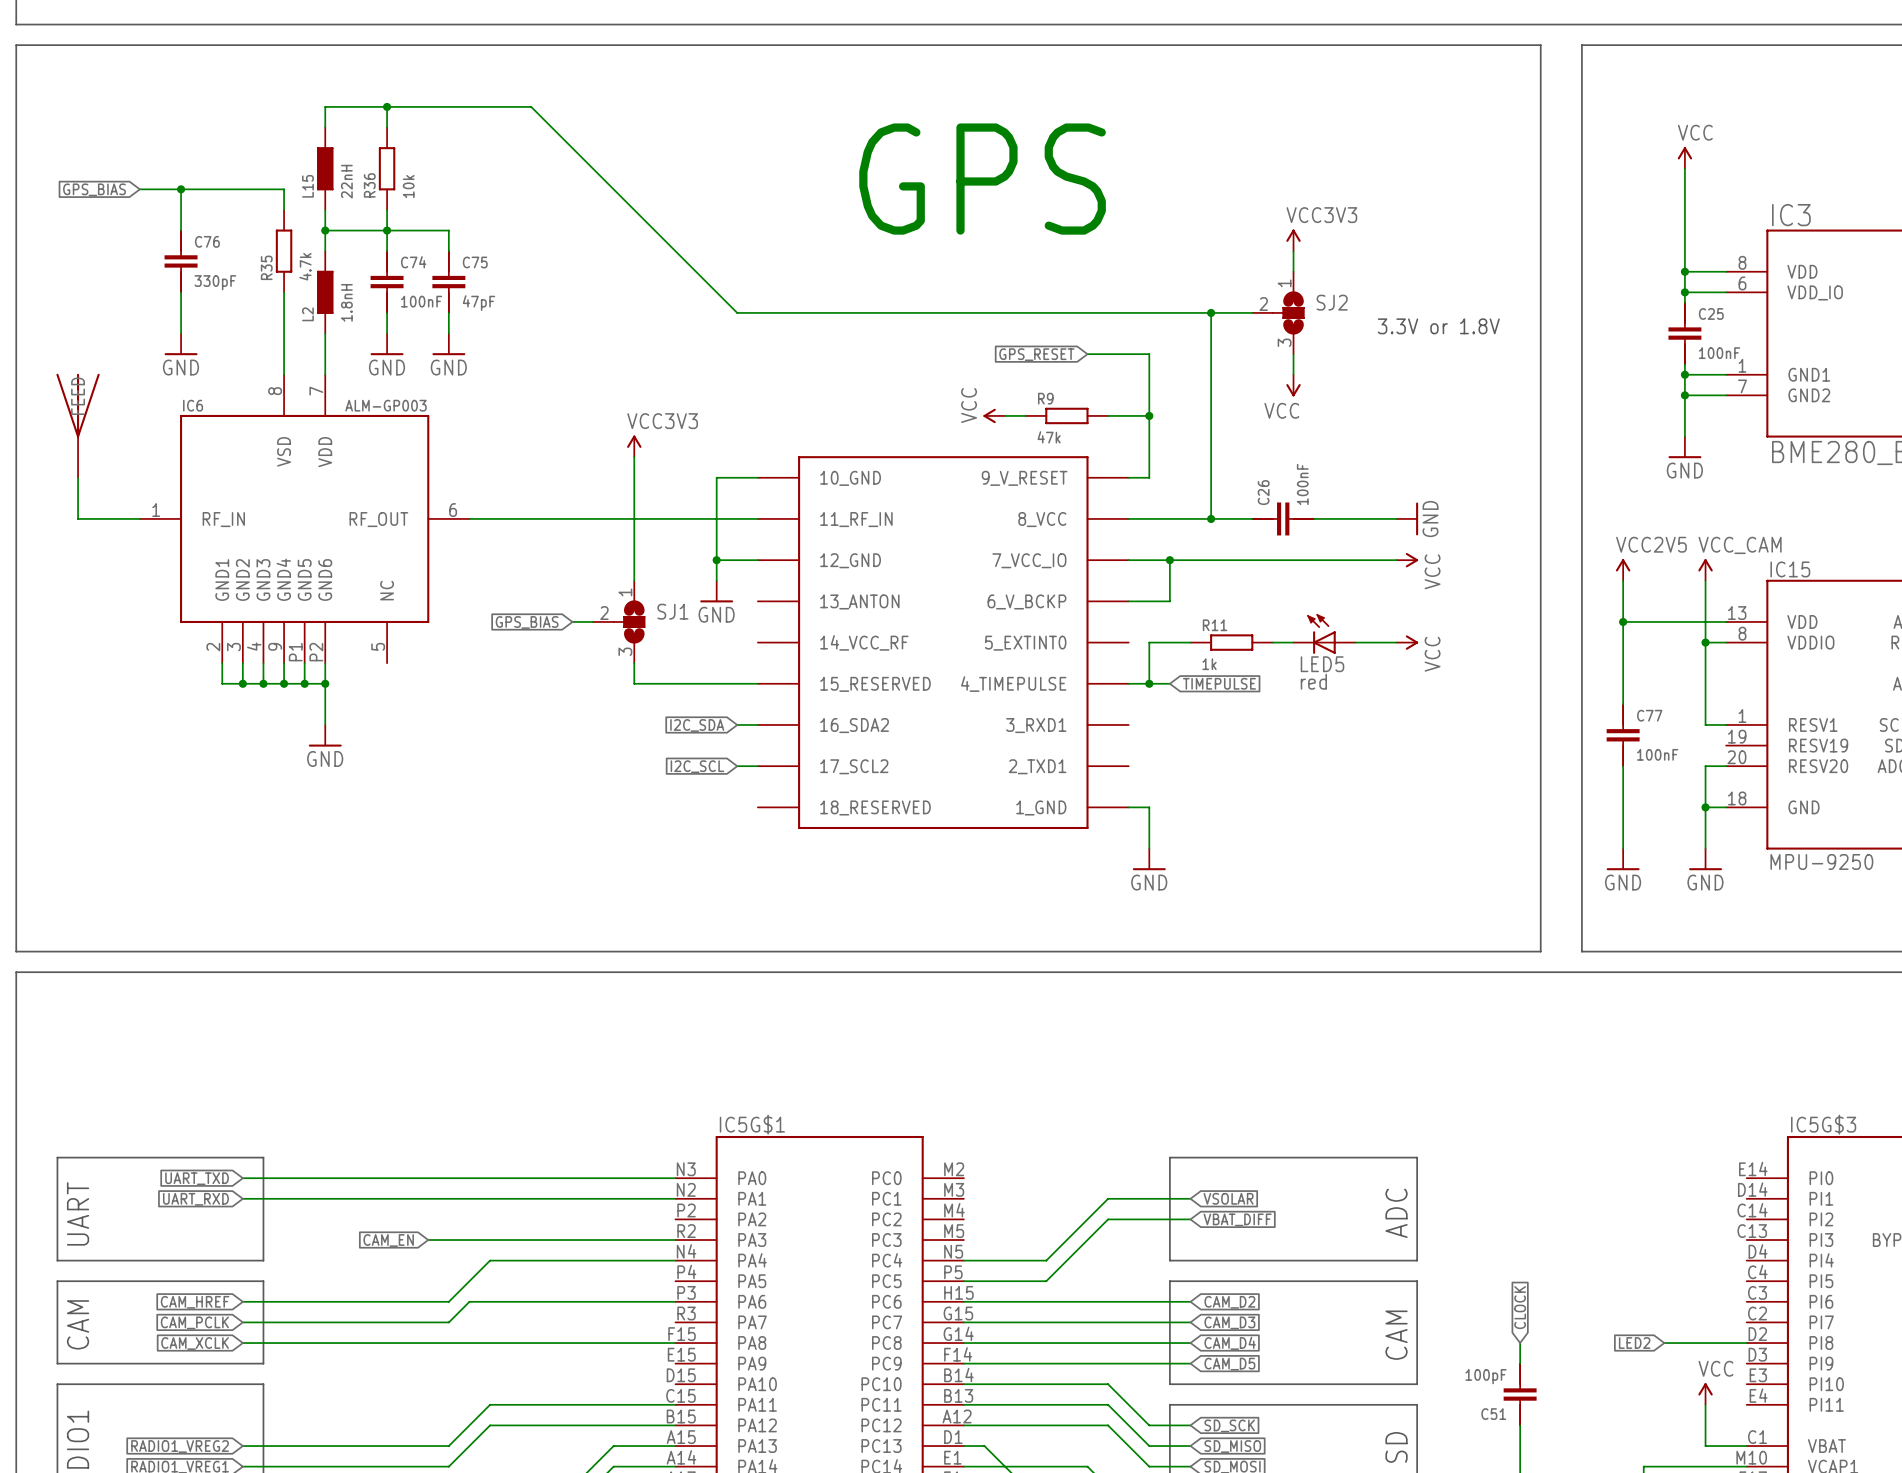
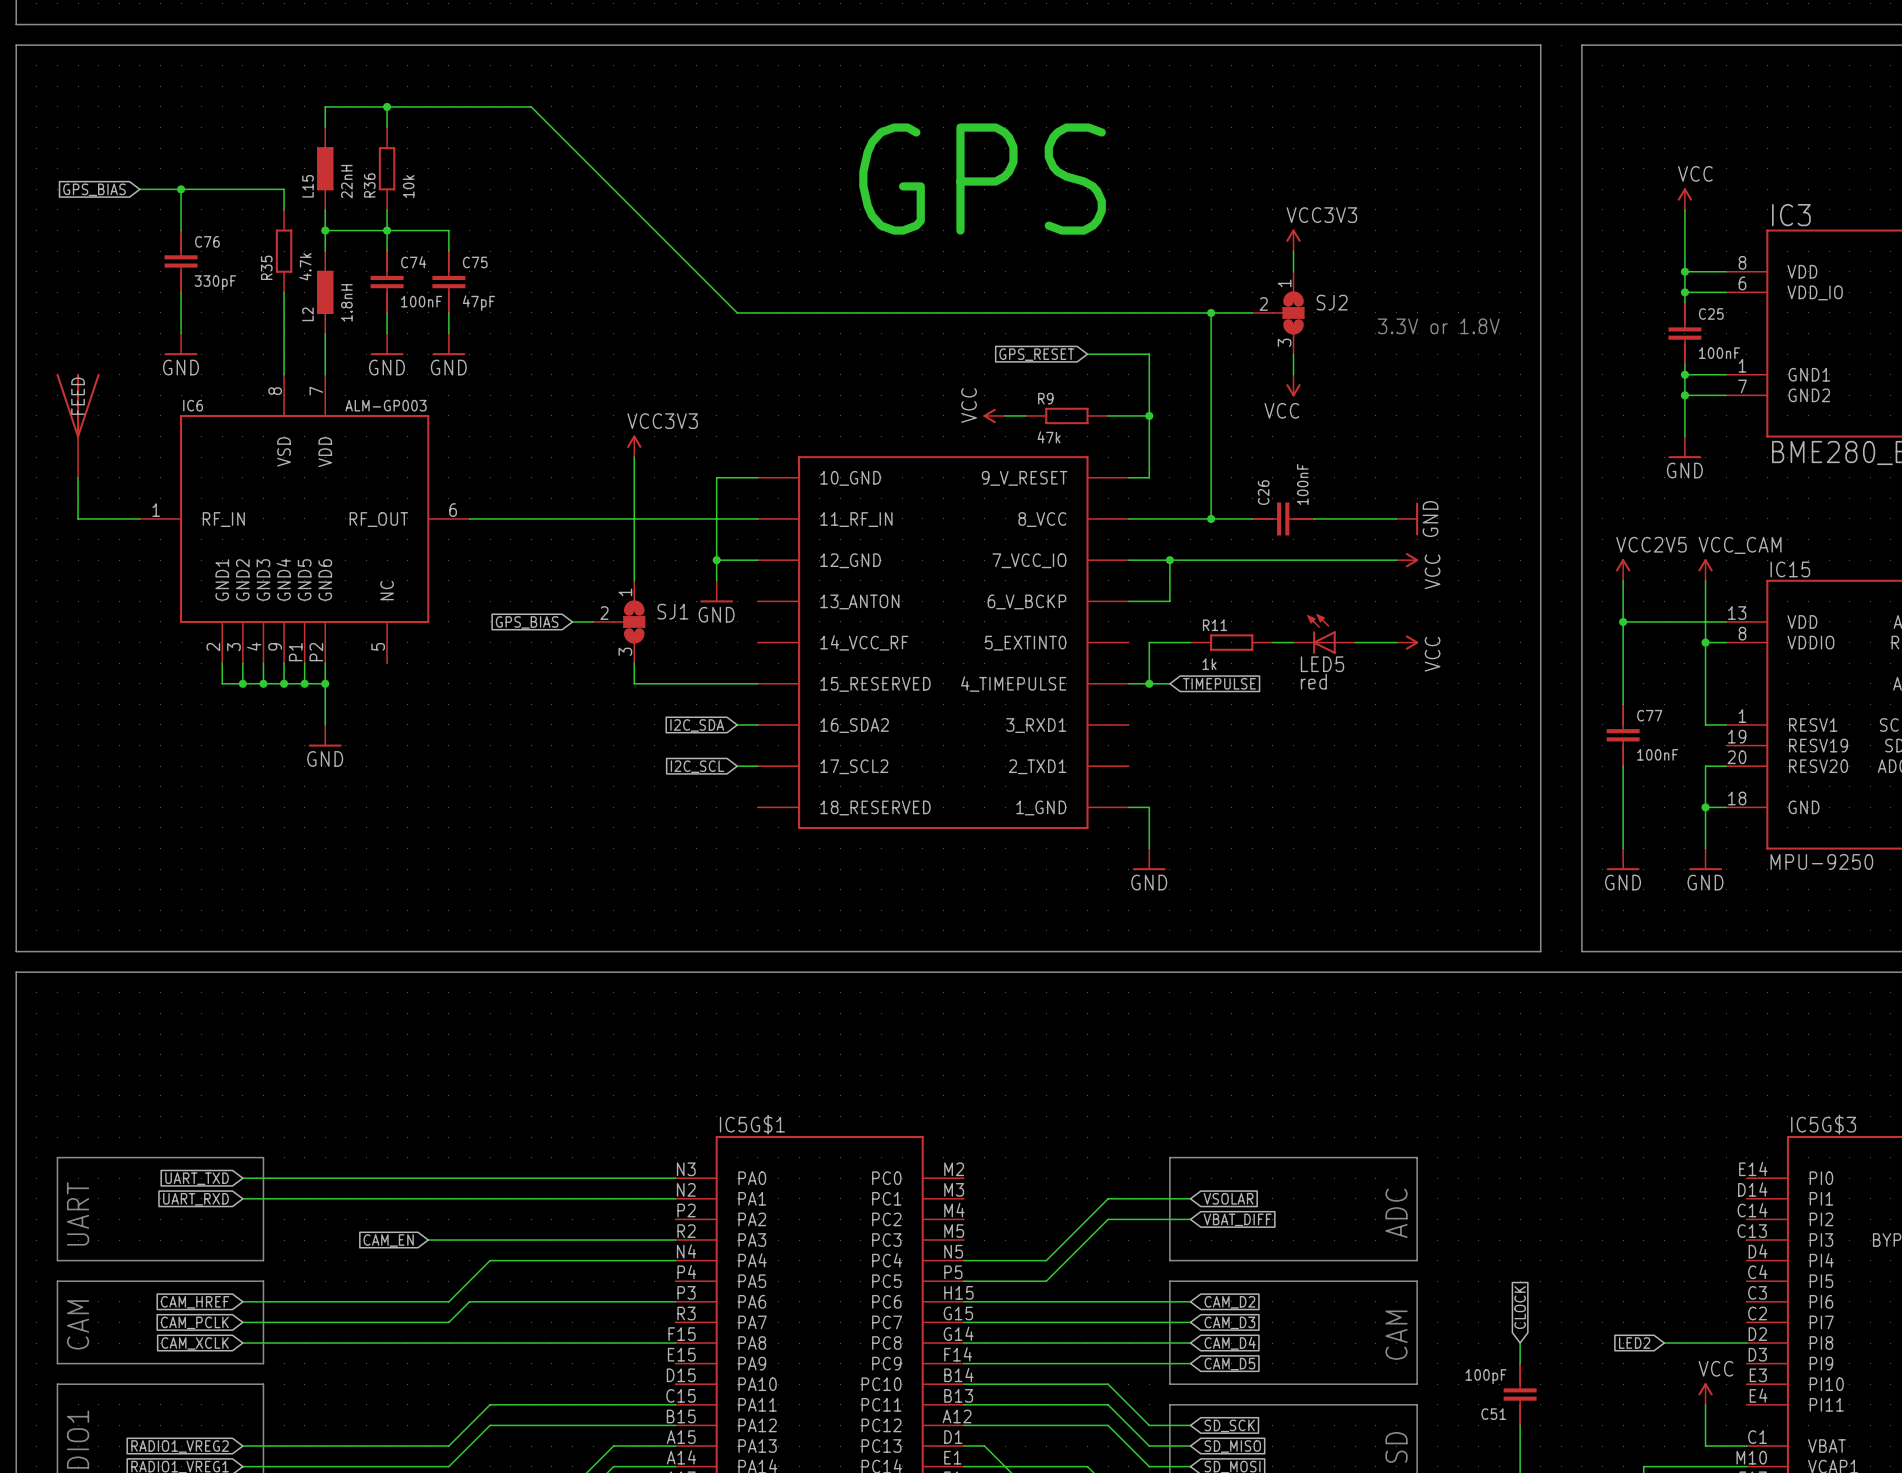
power symbol position: VCC (1684, 157) -> VCC (1684, 199)

